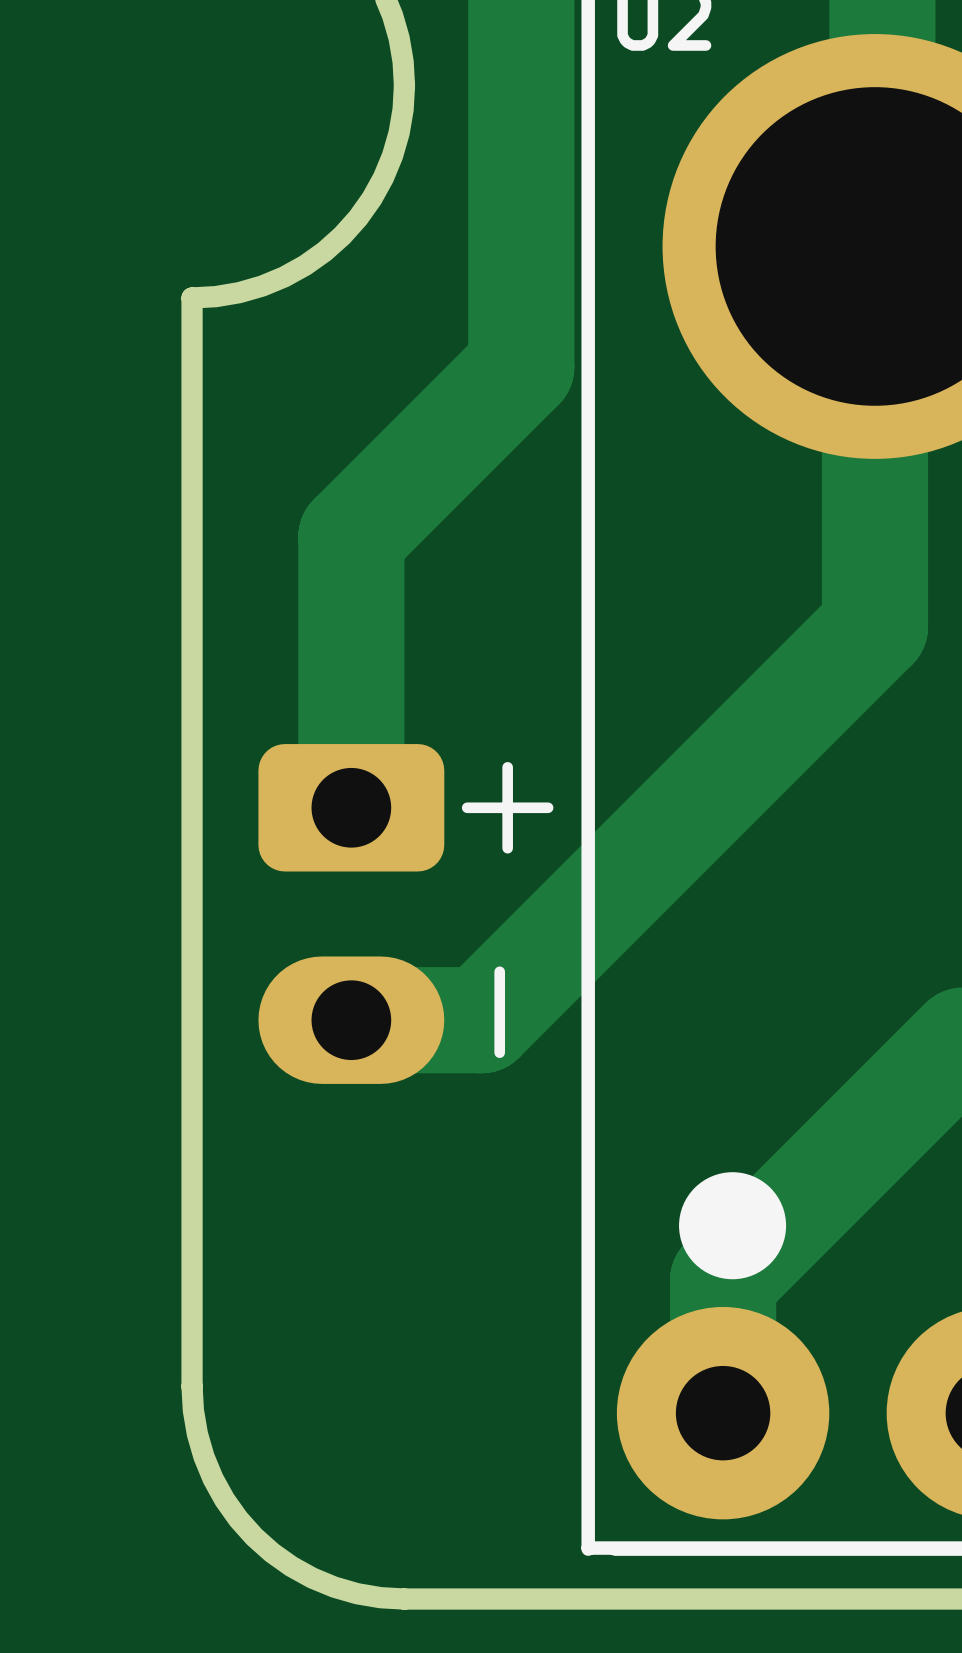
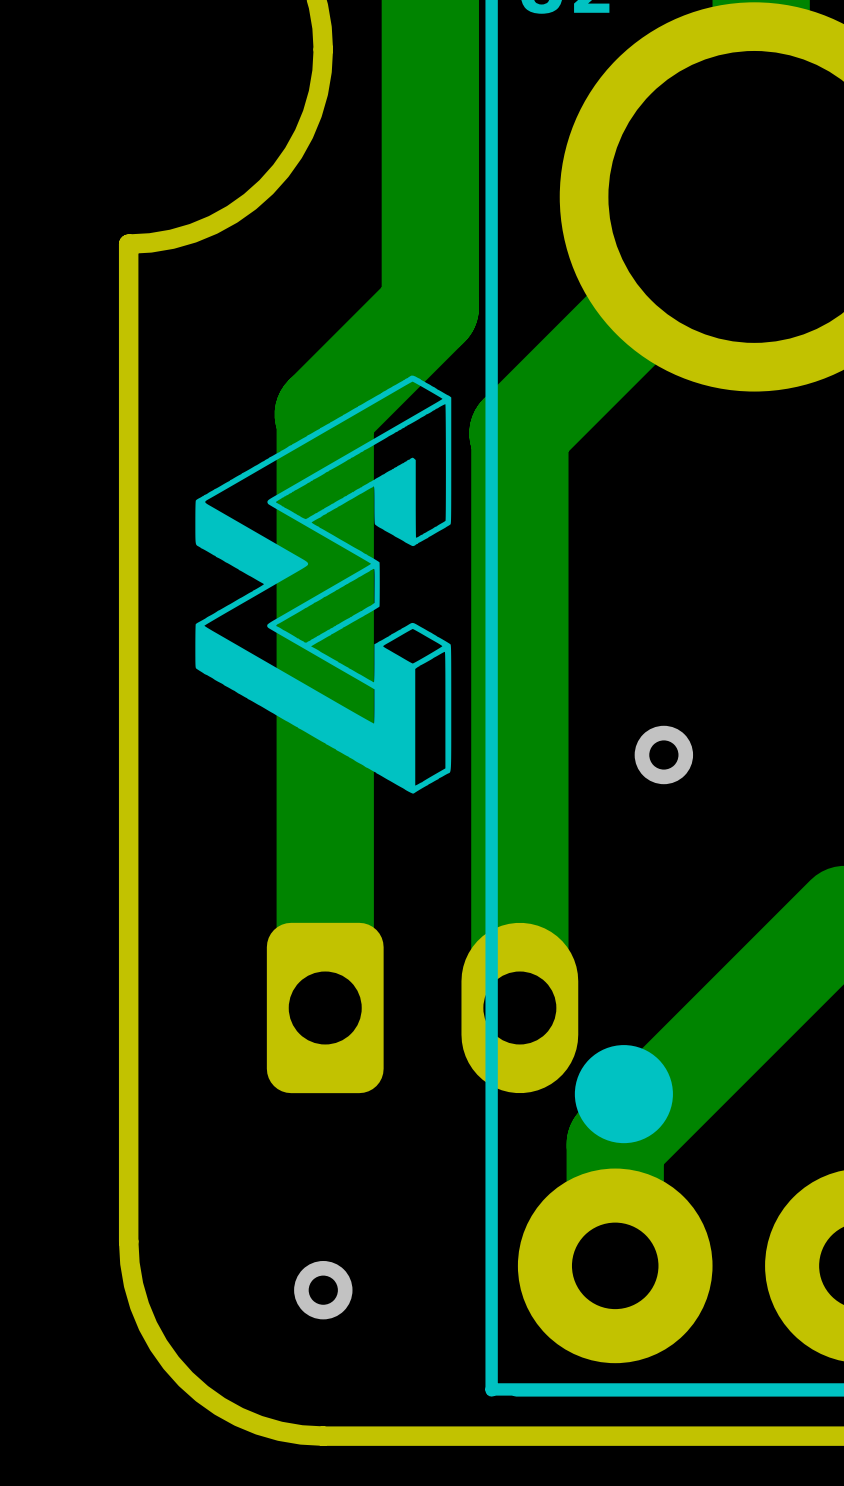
track: (874, 246) (874, 626) (481, 1020) (351, 1020) -> (754, 196) (517, 433) (519, 435) (519, 1007)
drawing: none -> [195, 375, 452, 794]
track: (404, 483) (351, 536) (351, 807) -> (323, 414) (325, 416) (325, 1007)
via: none -> (663, 754)
part: (351, 913) -> none
part: none -> (422, 1007)
via: none -> (323, 1290)

